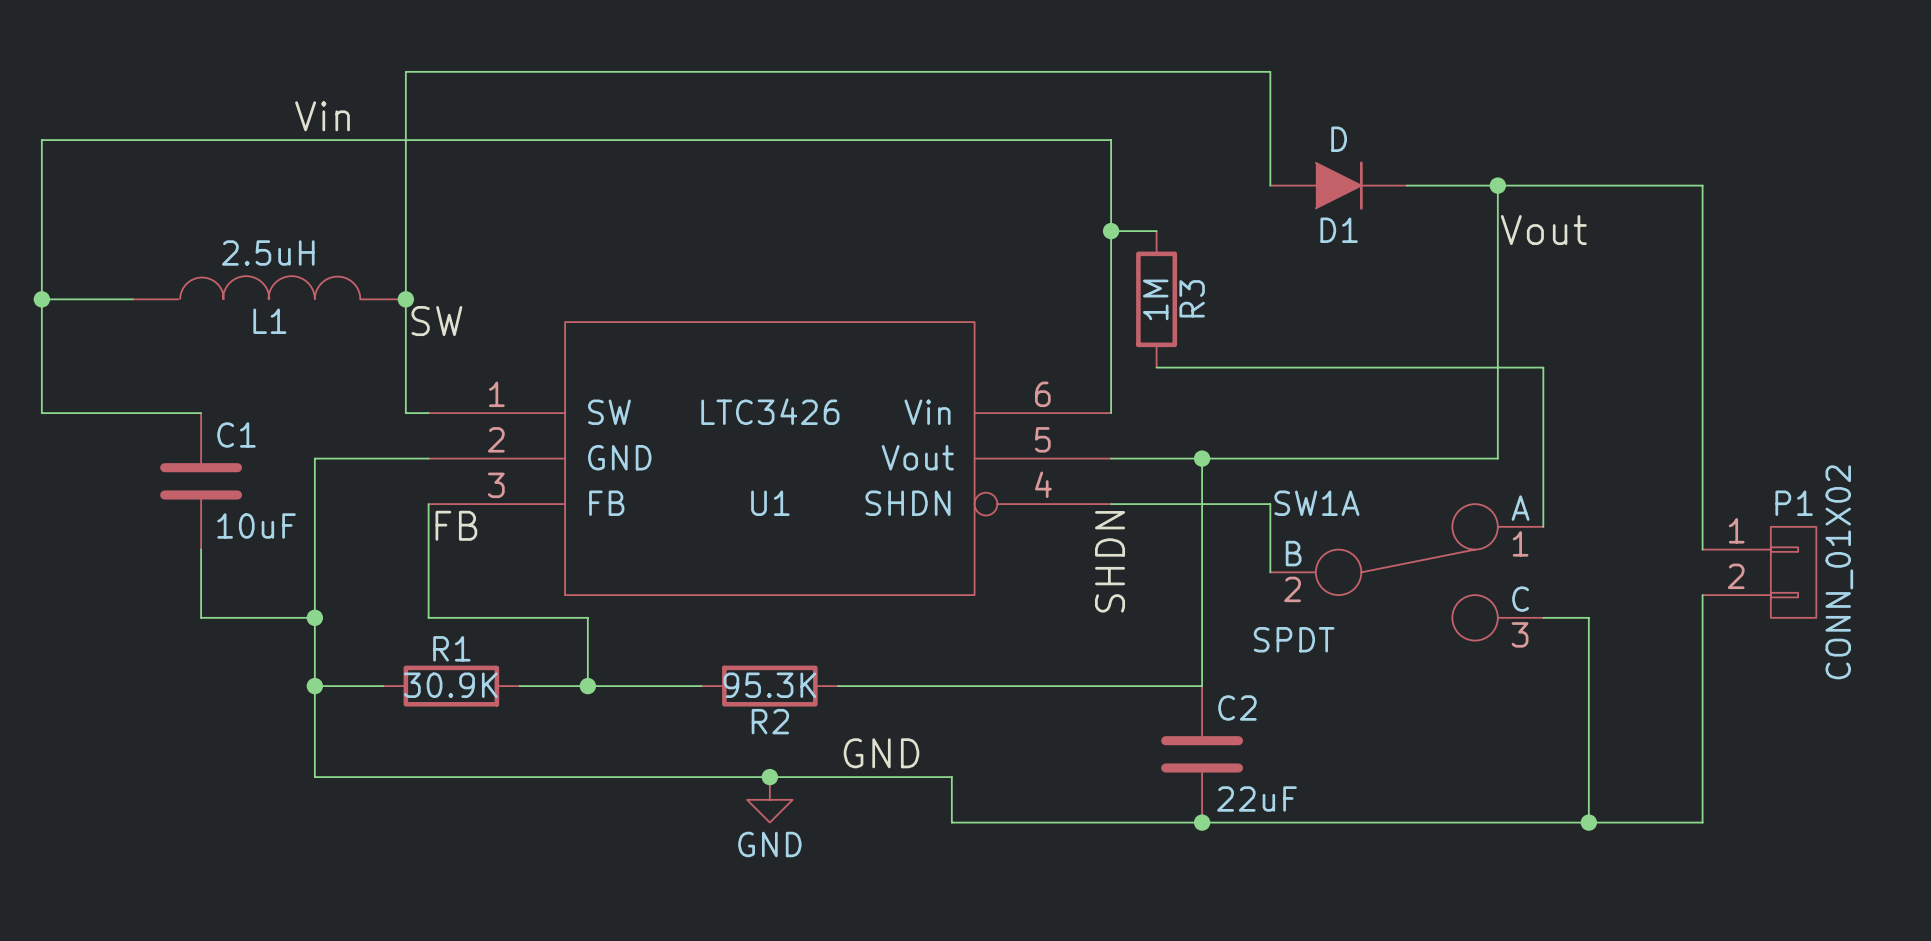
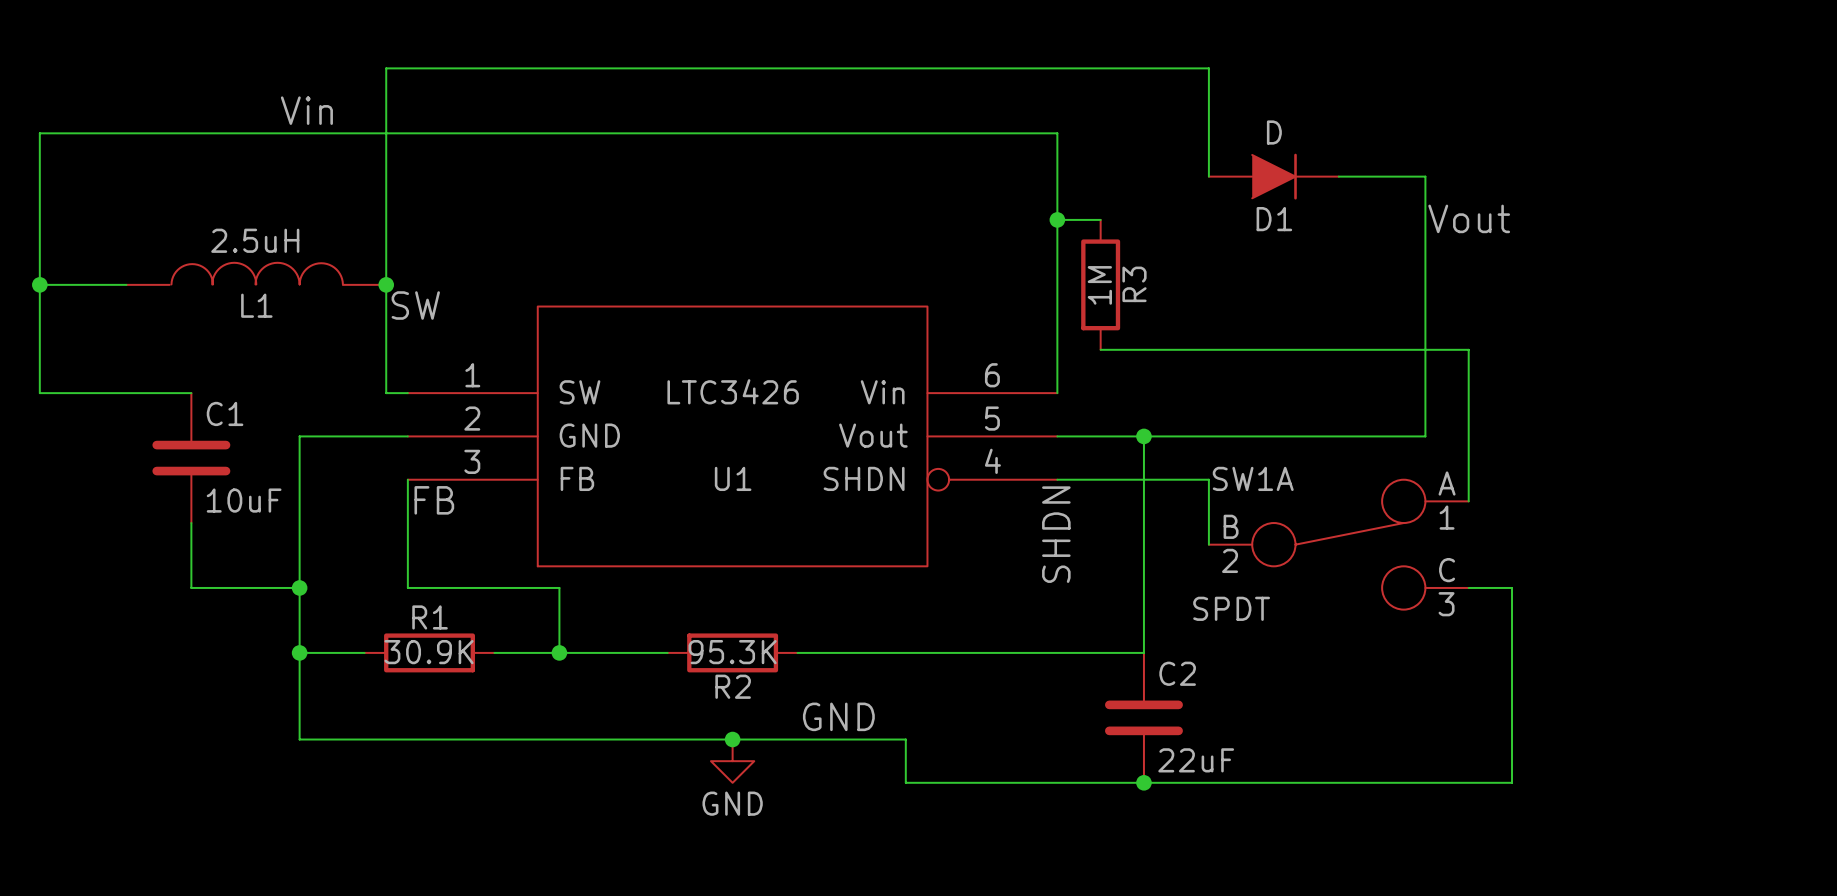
wire: (1497, 185) (1702, 185) (1702, 549) -> none
junction: (1497, 185) -> none
P1: CONN_01X02 (1759, 572) -> none
wire: (1702, 595) (1702, 822) (1588, 822) -> none
junction: (1588, 822) -> none

